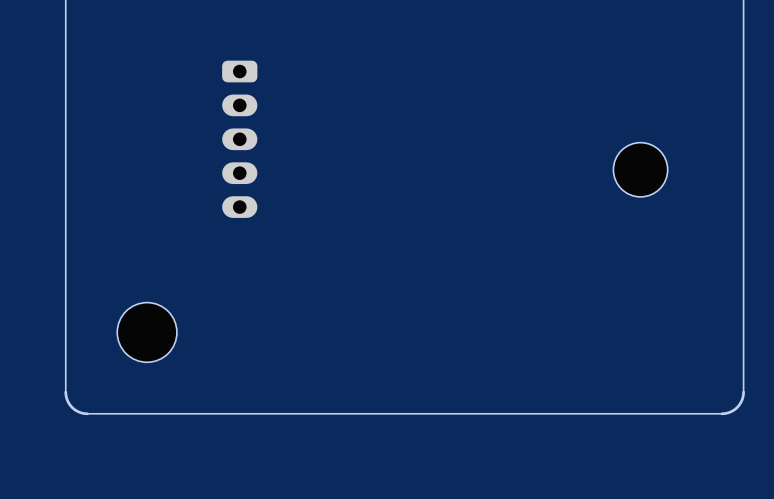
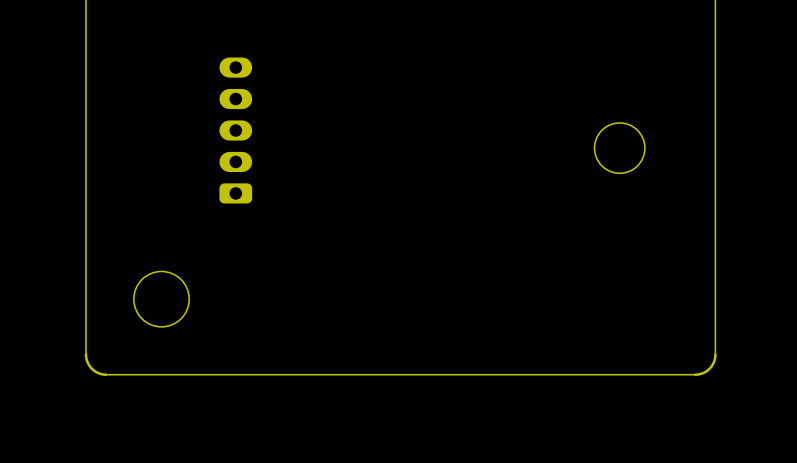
part rotation: 0° (239, 139) -> 180° (235, 130)

